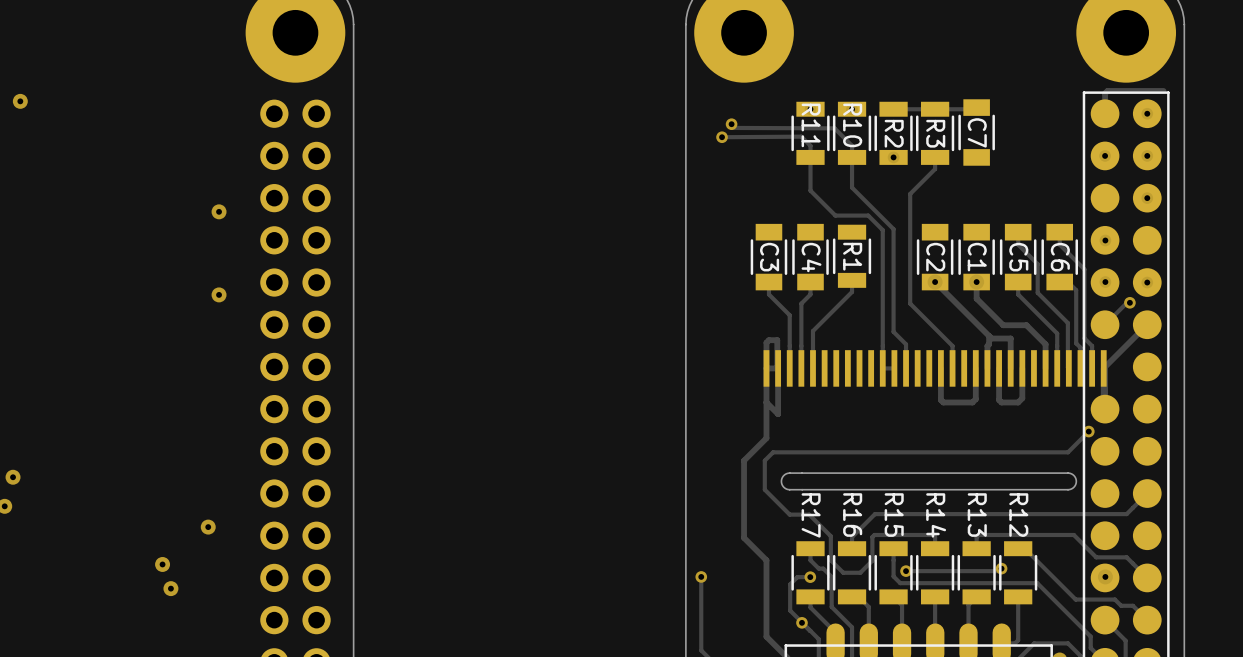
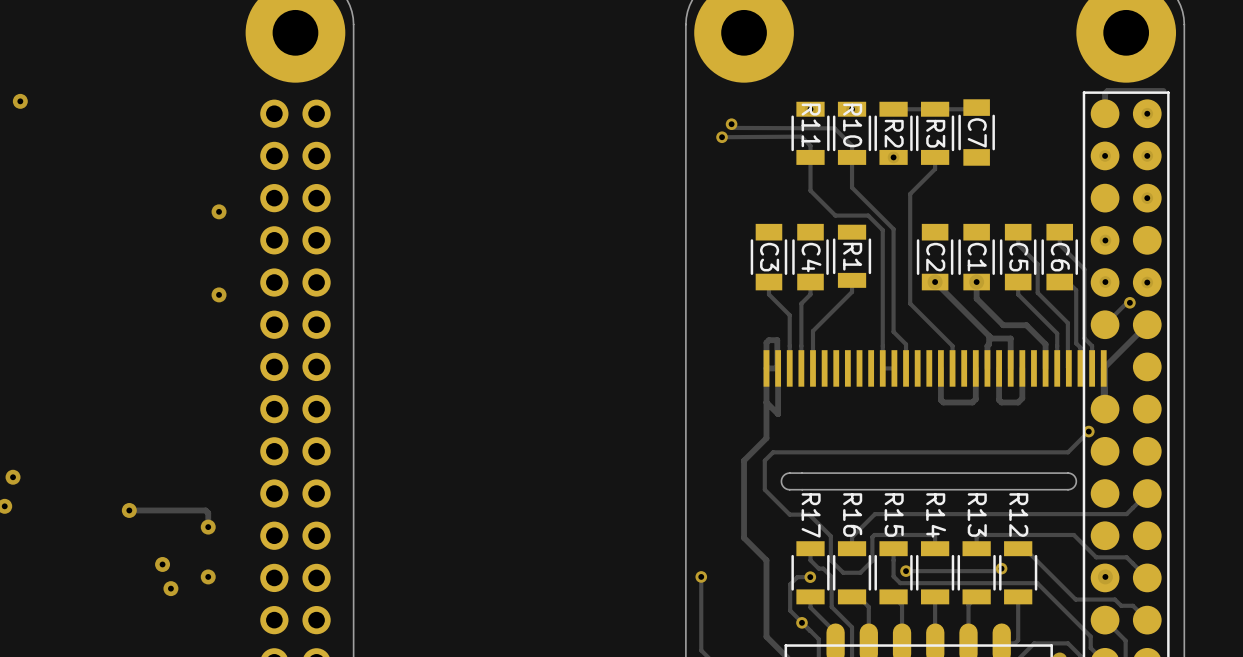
track: none -> (129, 510) (205, 510) (208, 512) (208, 527)
via: none -> (129, 510)
via: none -> (208, 576)

